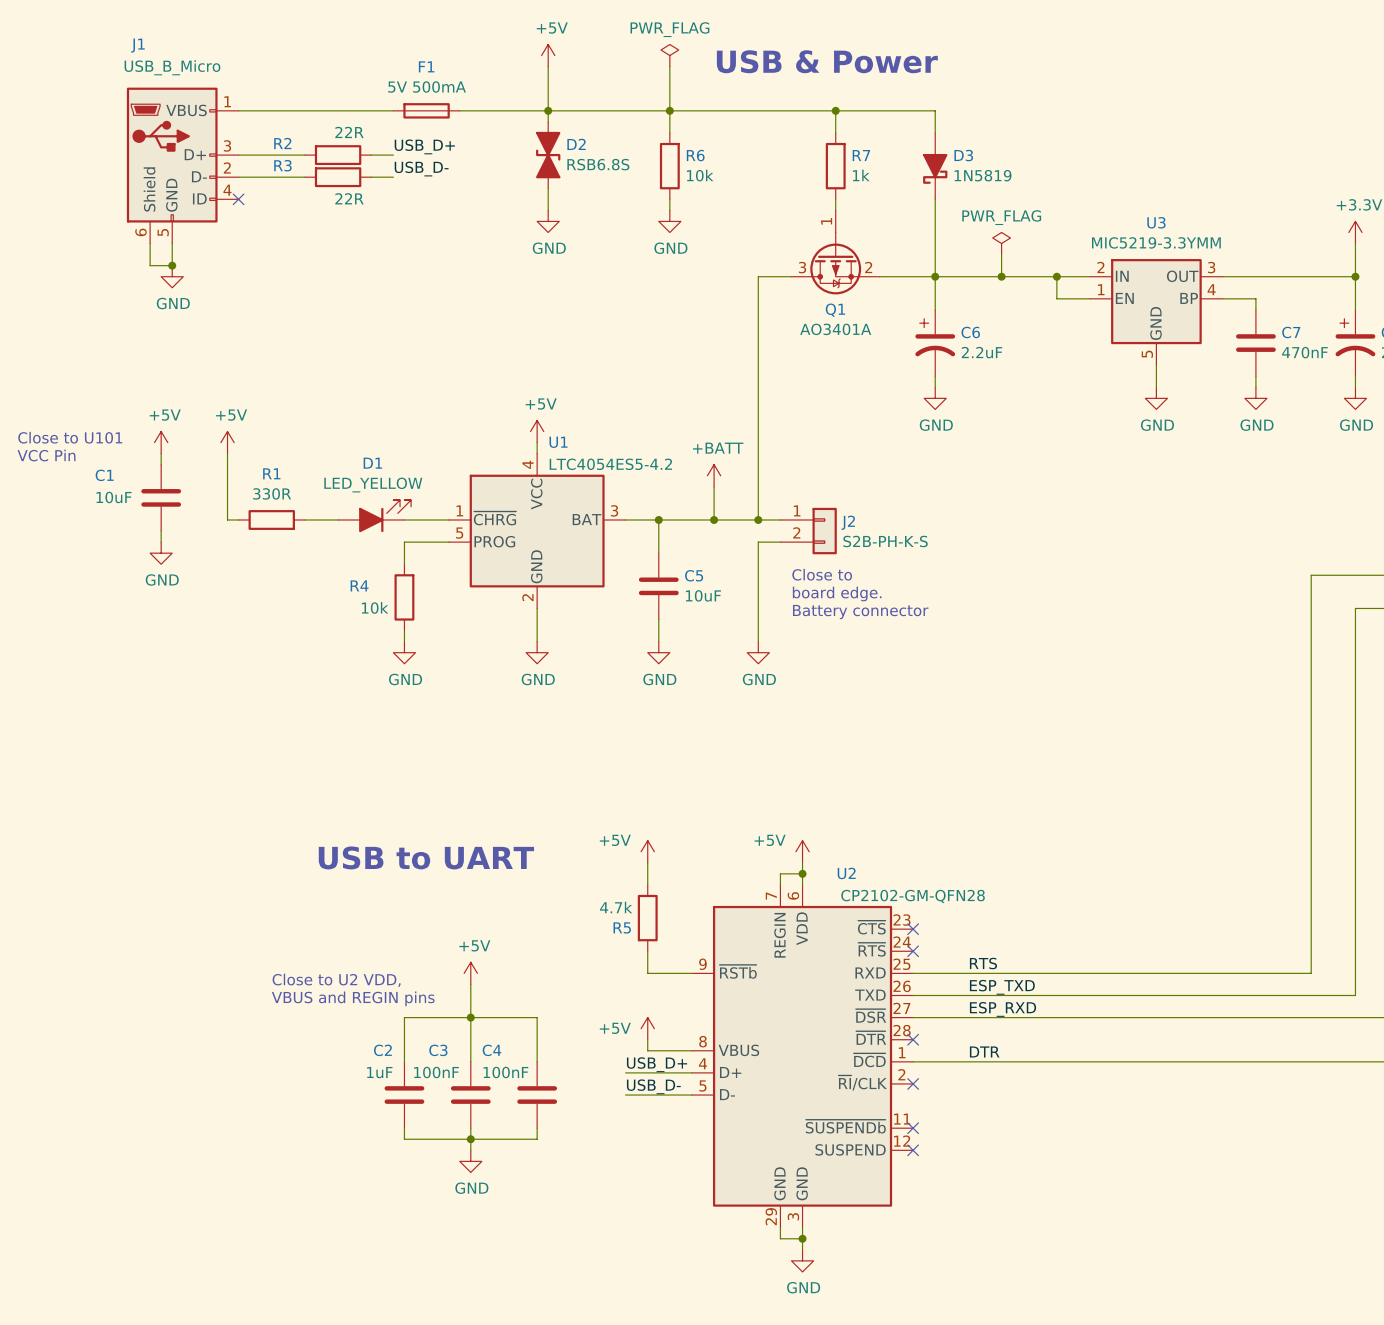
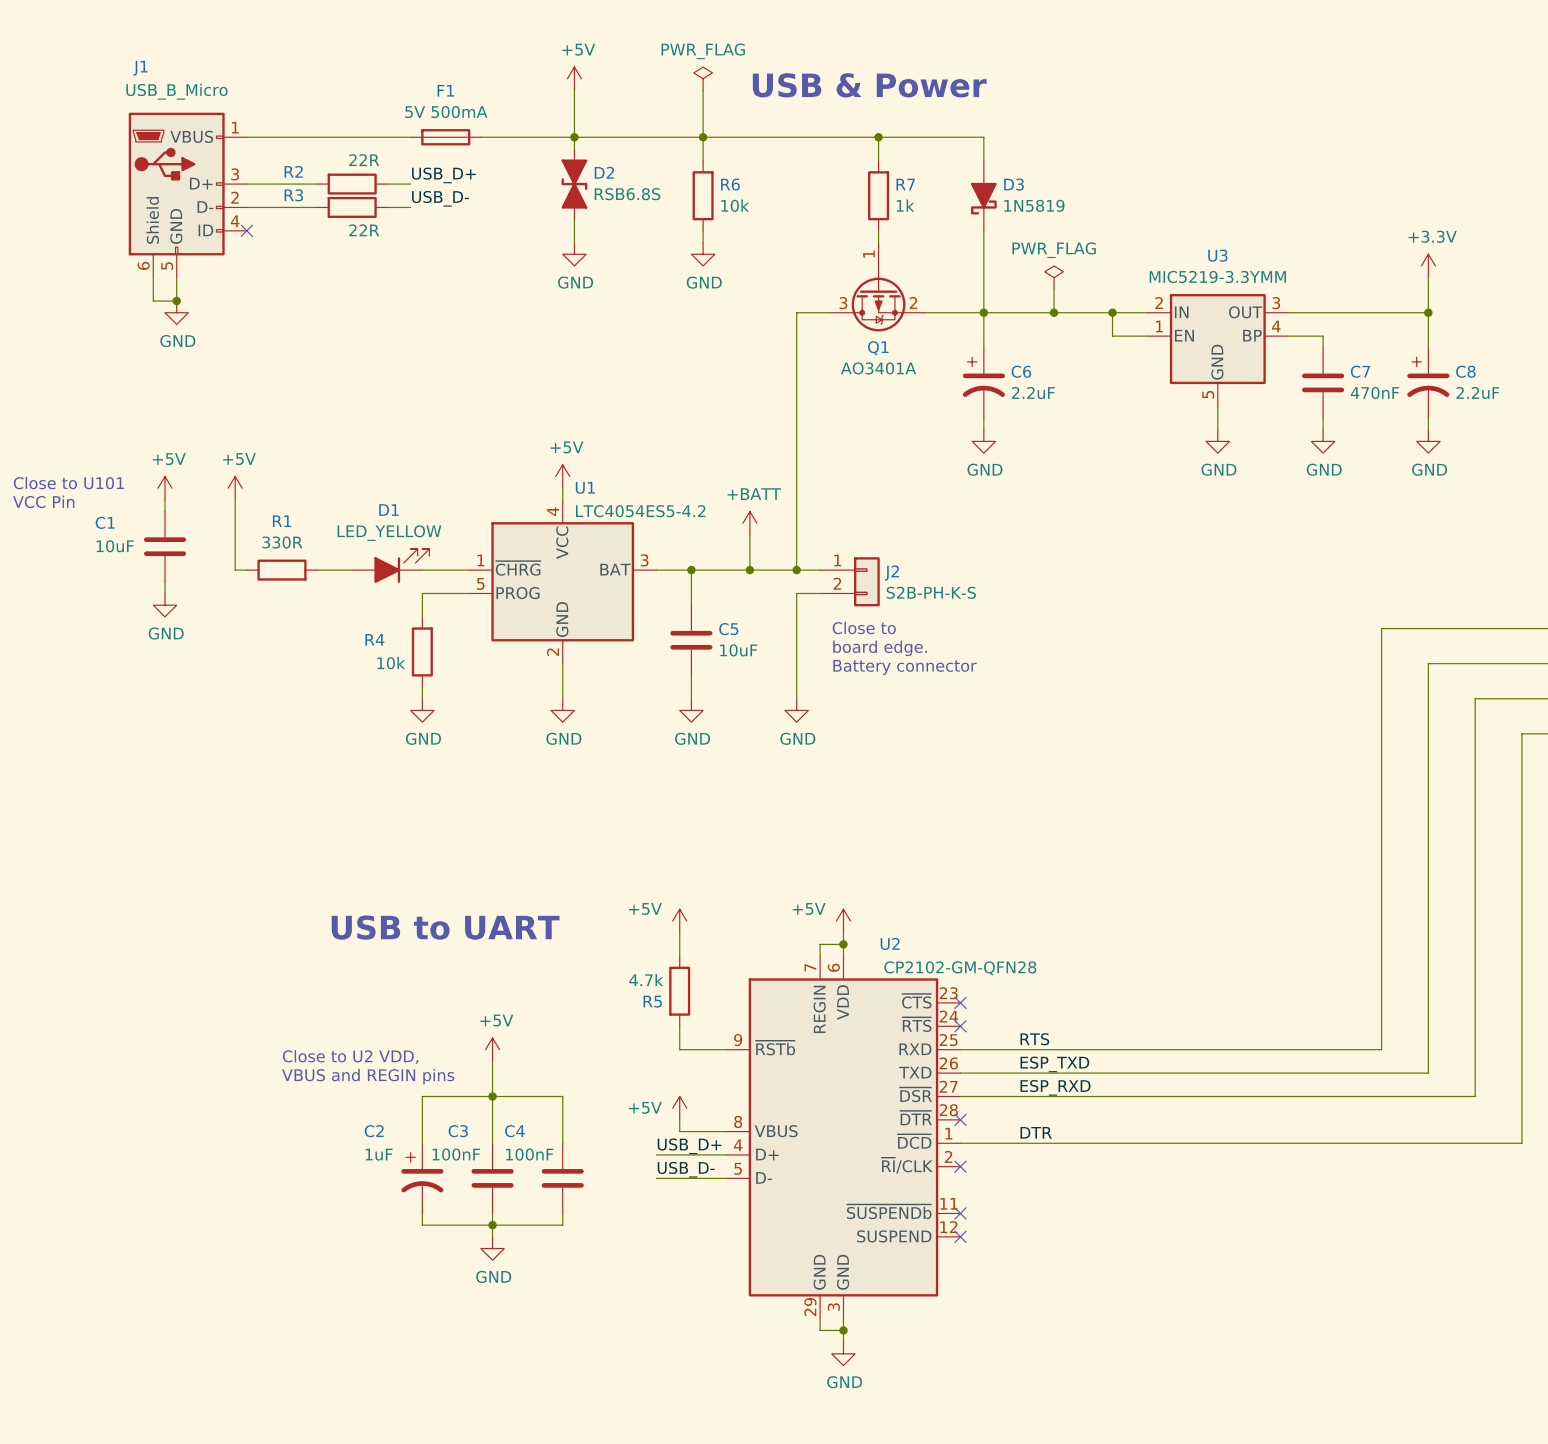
C2 symbol: [384, 1061, 425, 1129] -> [401, 1143, 444, 1214]

